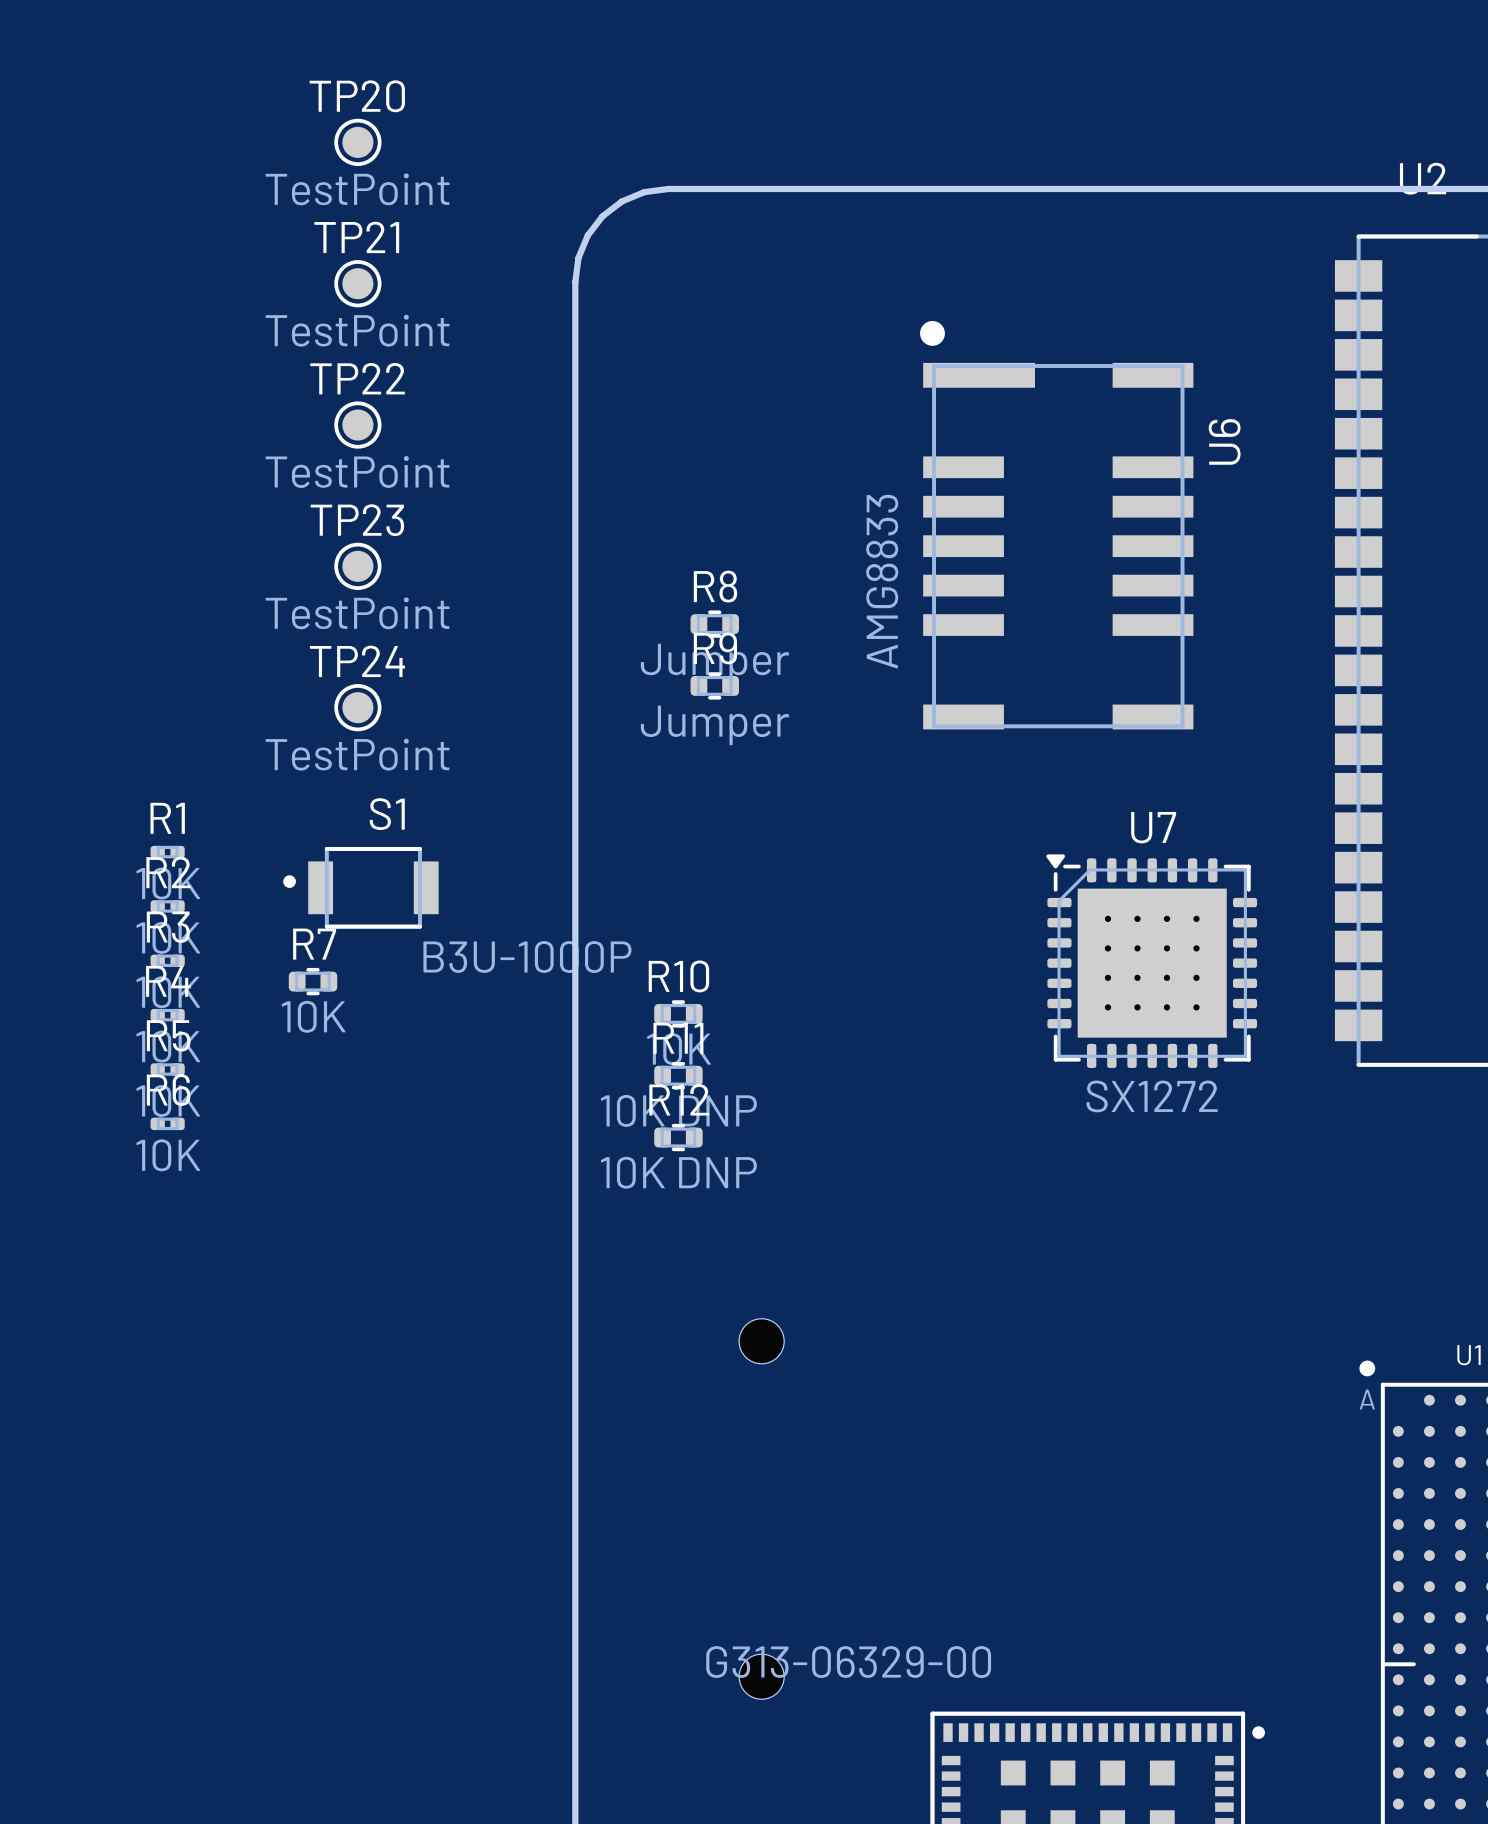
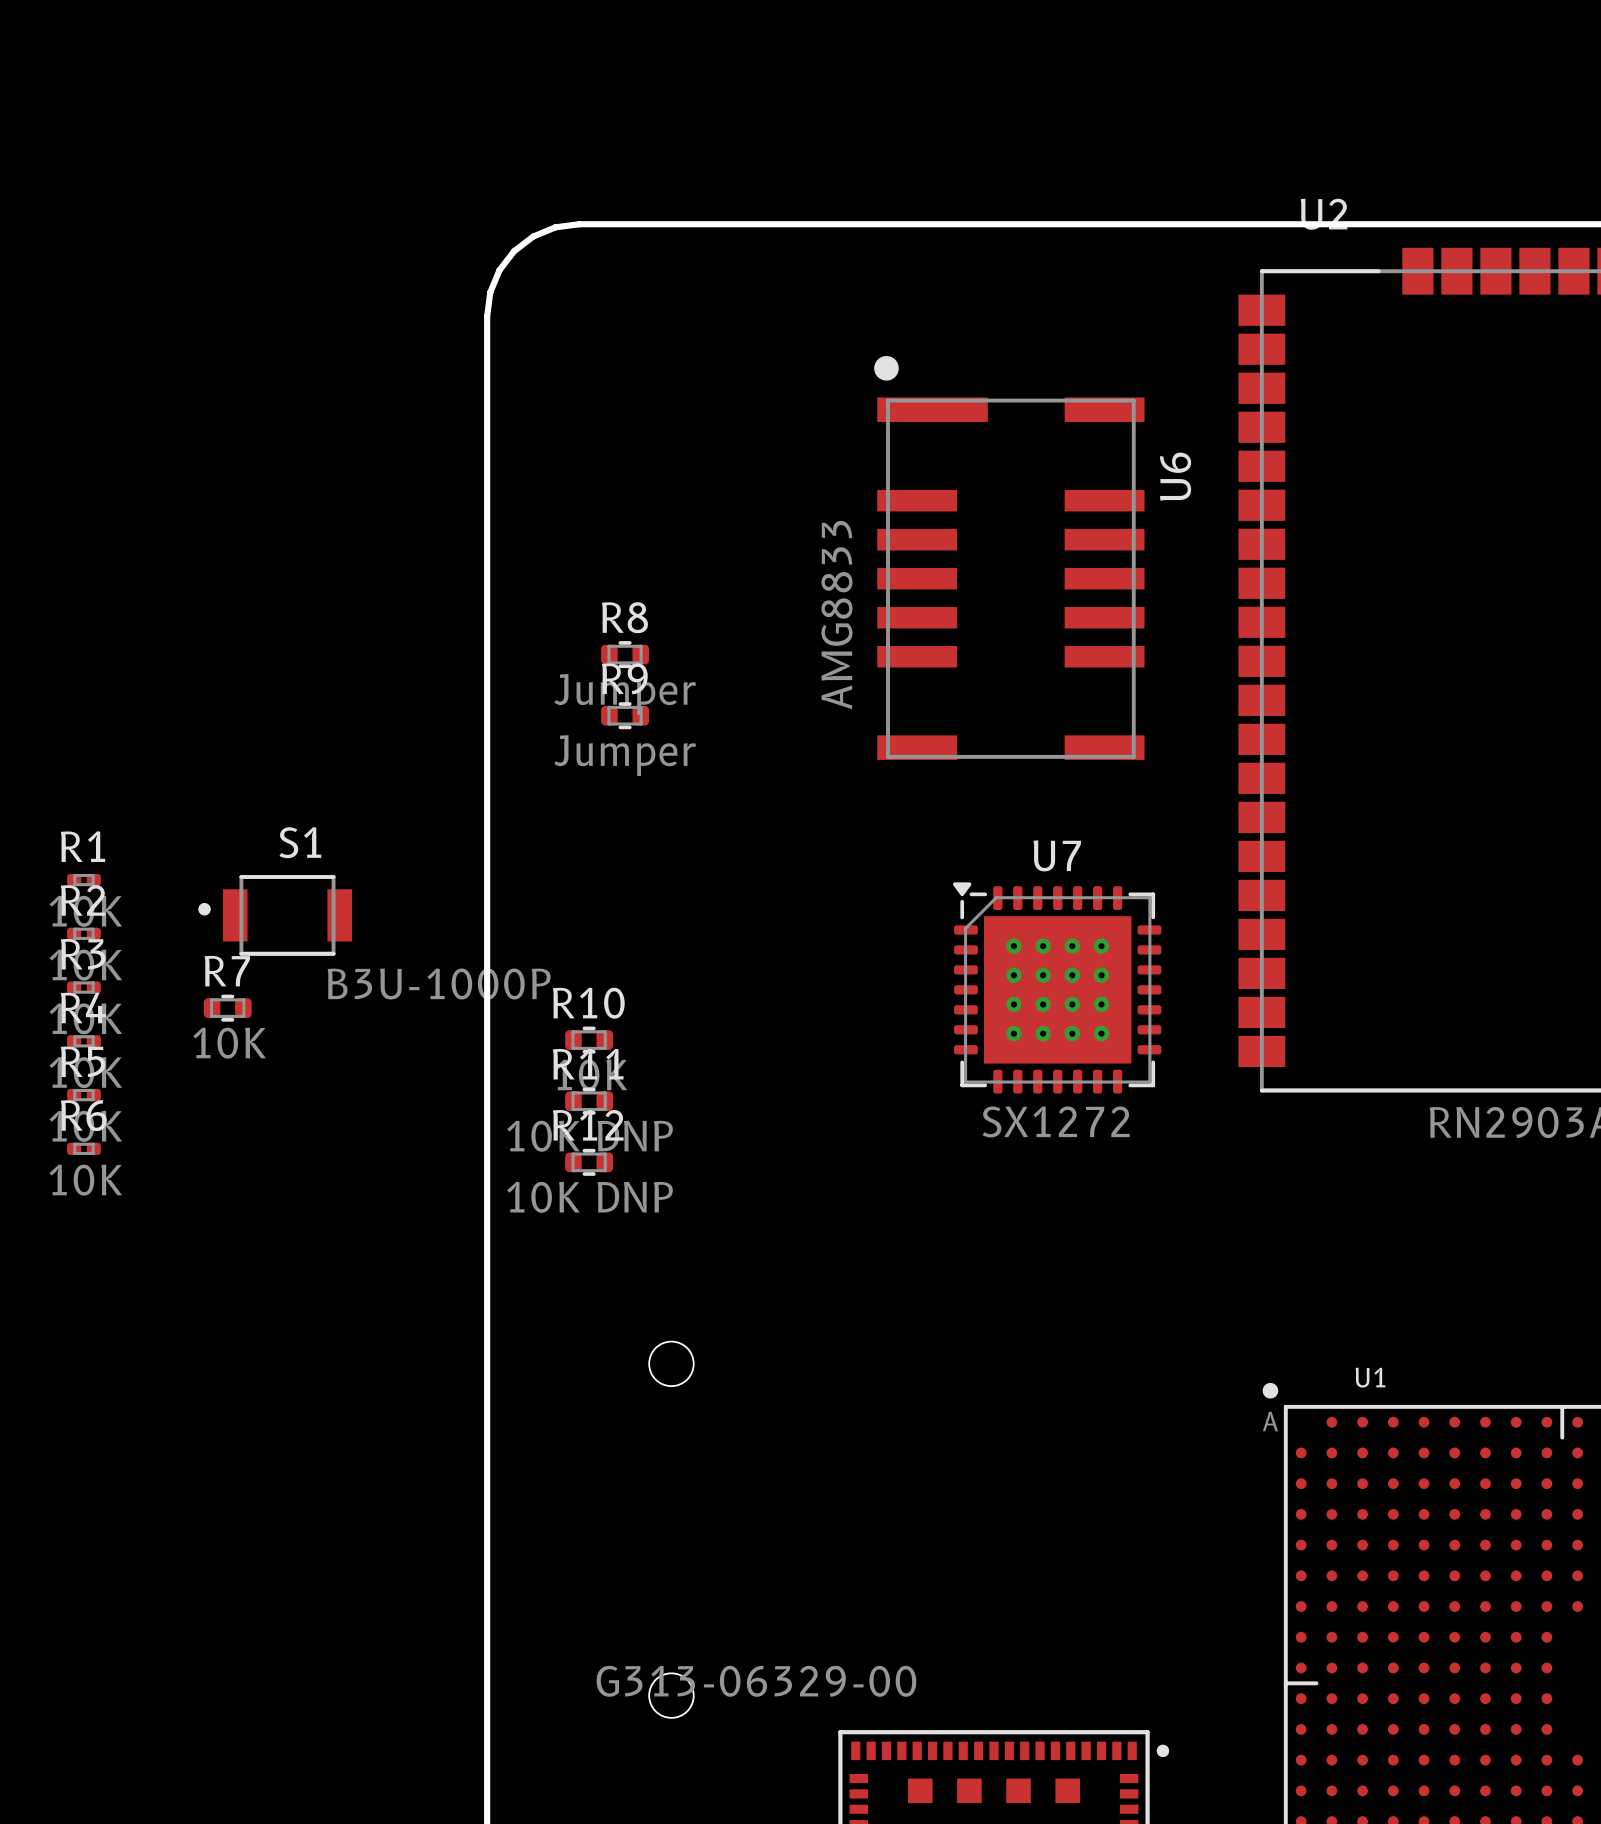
TP20: TestPoint (357, 142) -> none
TP21: TestPoint (357, 283) -> none
TP22: TestPoint (357, 425) -> none
U6 position: (1056, 525) -> (1009, 557)
TP23: TestPoint (357, 566) -> none
TP24: TestPoint (357, 707) -> none

